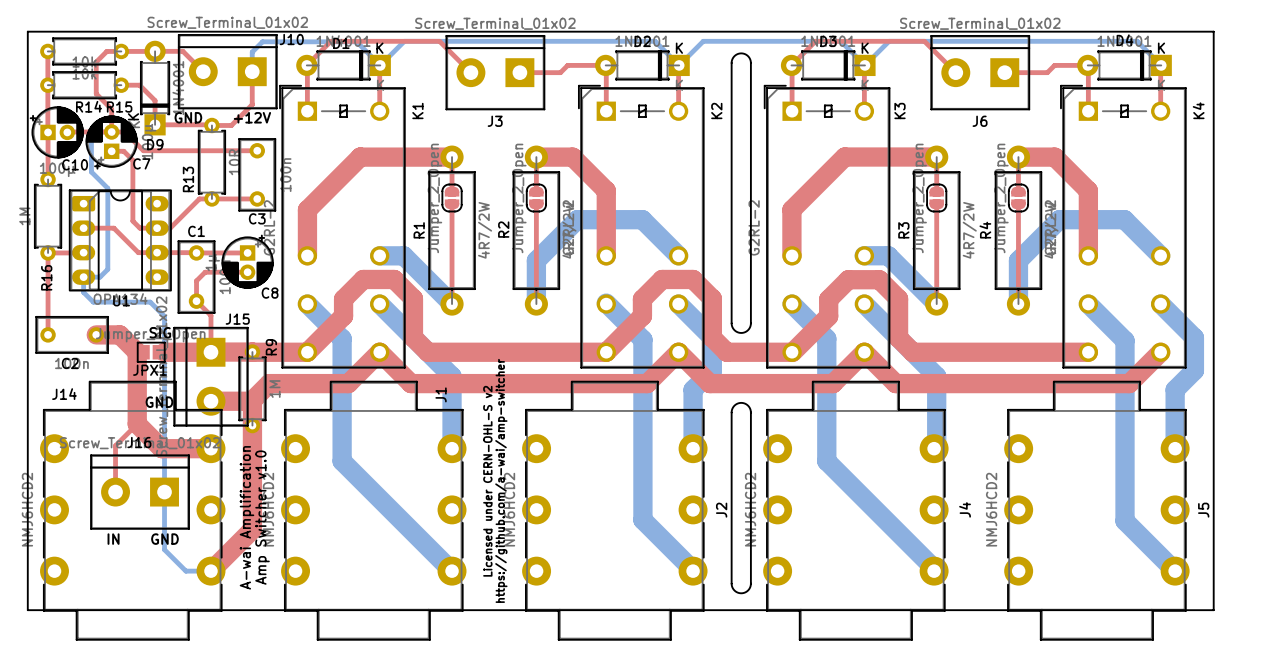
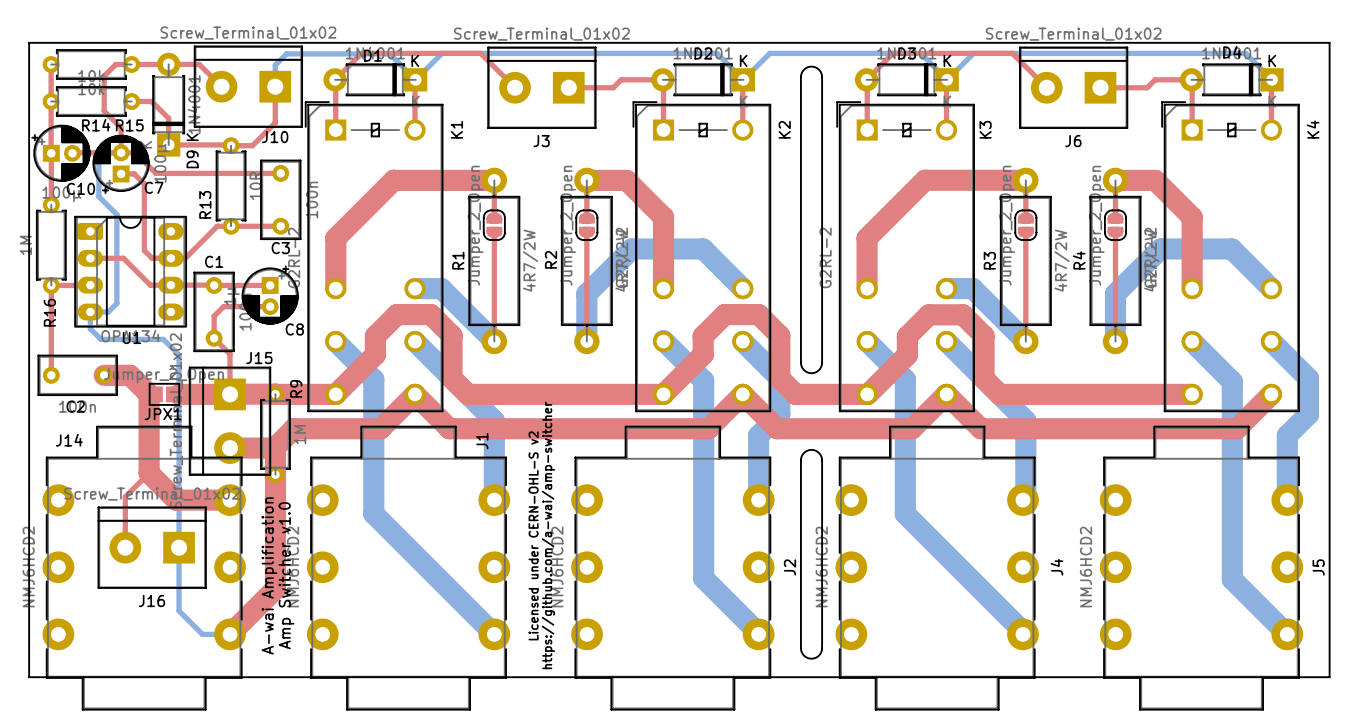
J10 name position: J10 (291, 39) -> J10 (275, 137)
D9 text position: K (133, 116) -> K (192, 137)
text: GND +12V (222, 117) -> none
D9 name rotation: 0° (155, 144) -> 90° counterclockwise (192, 159)
text: SIG (160, 332) -> none
text: GND (159, 402) -> none
J16 name position: J16 (139, 442) -> J16 (151, 601)
text: IN GND (143, 539) -> none

